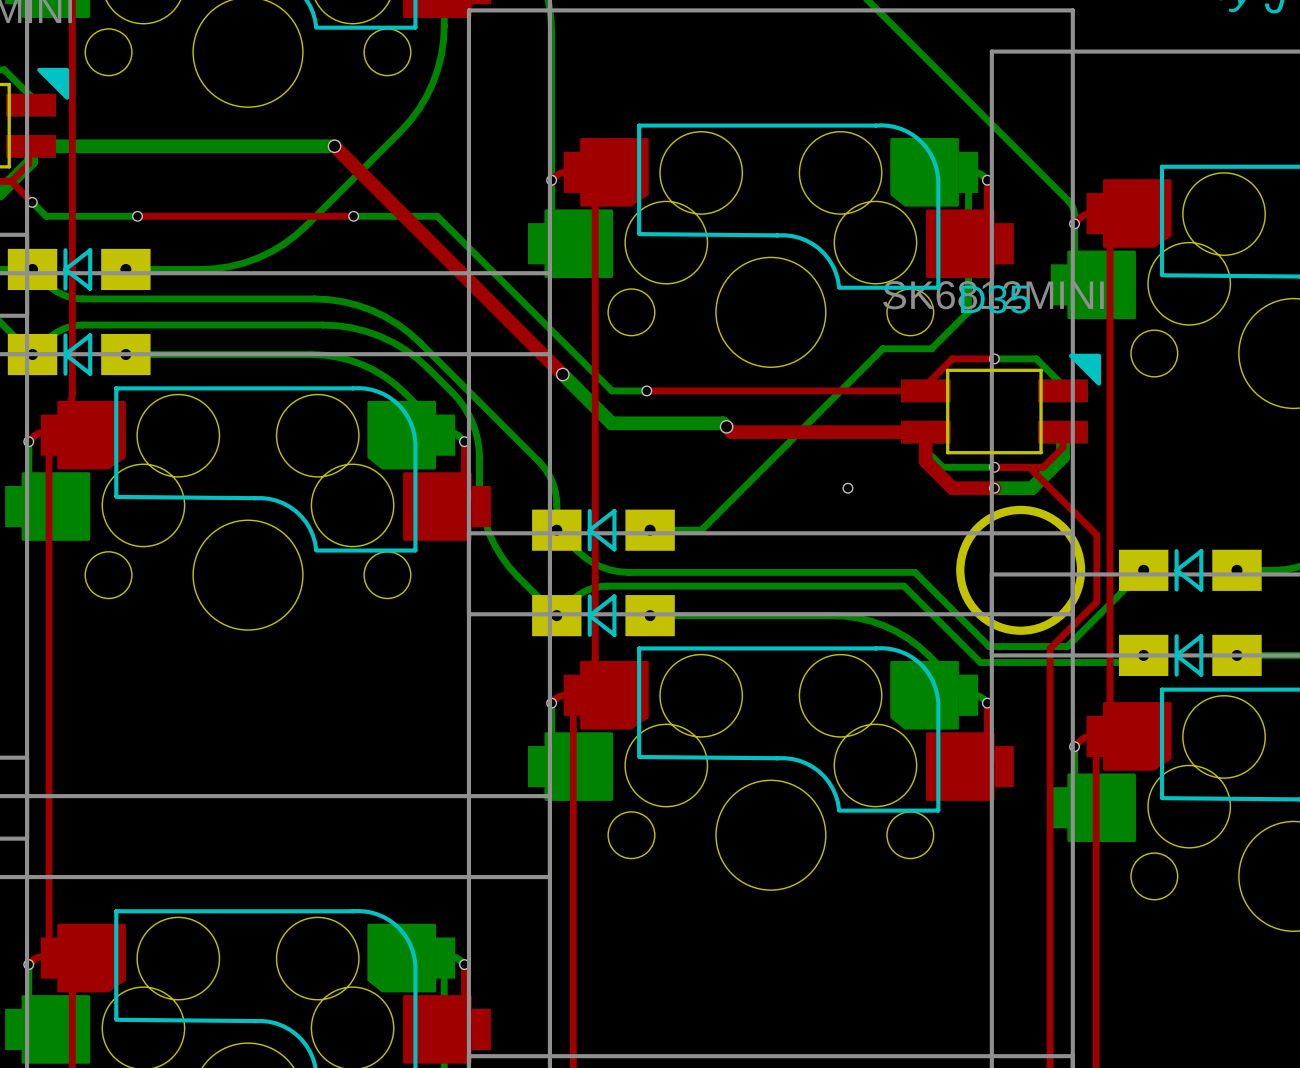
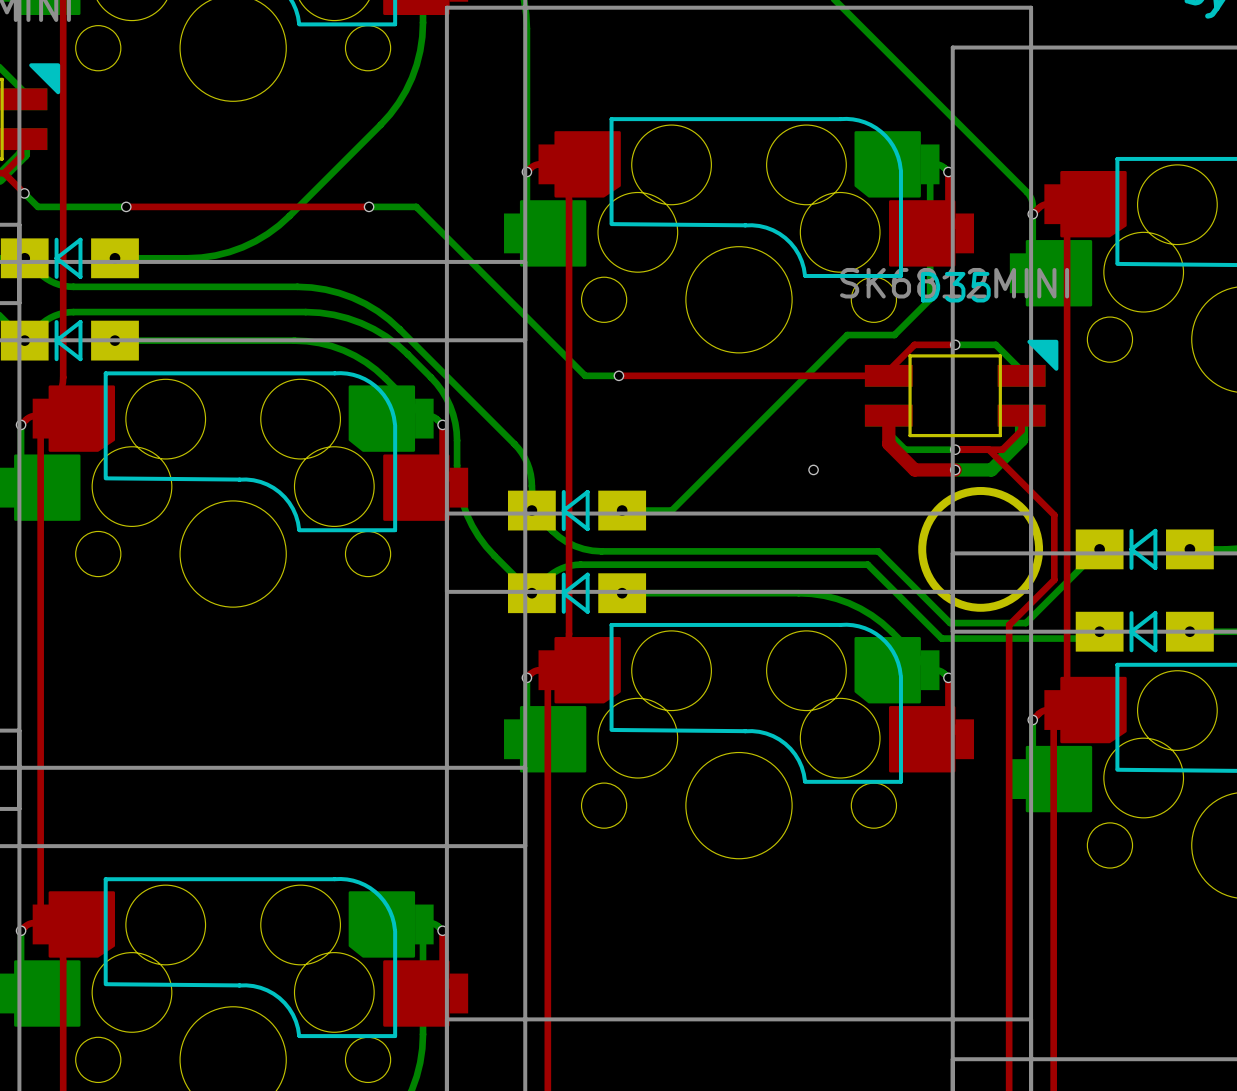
bottom track: (31, 146) (334, 146) -> none
top track: (334, 146) (562, 374) -> none
via: (334, 146) -> none
bottom track: (353, 216) (388, 216) -> none
top track: none -> (335, 206) (369, 206)
via position: (353, 216) -> (369, 206)
bottom track: (562, 374) (611, 423) (723, 423) (726, 426) -> none
via: (562, 374) -> none
top track: (726, 426) (731, 432) (925, 432) -> none
via: (726, 426) -> none

